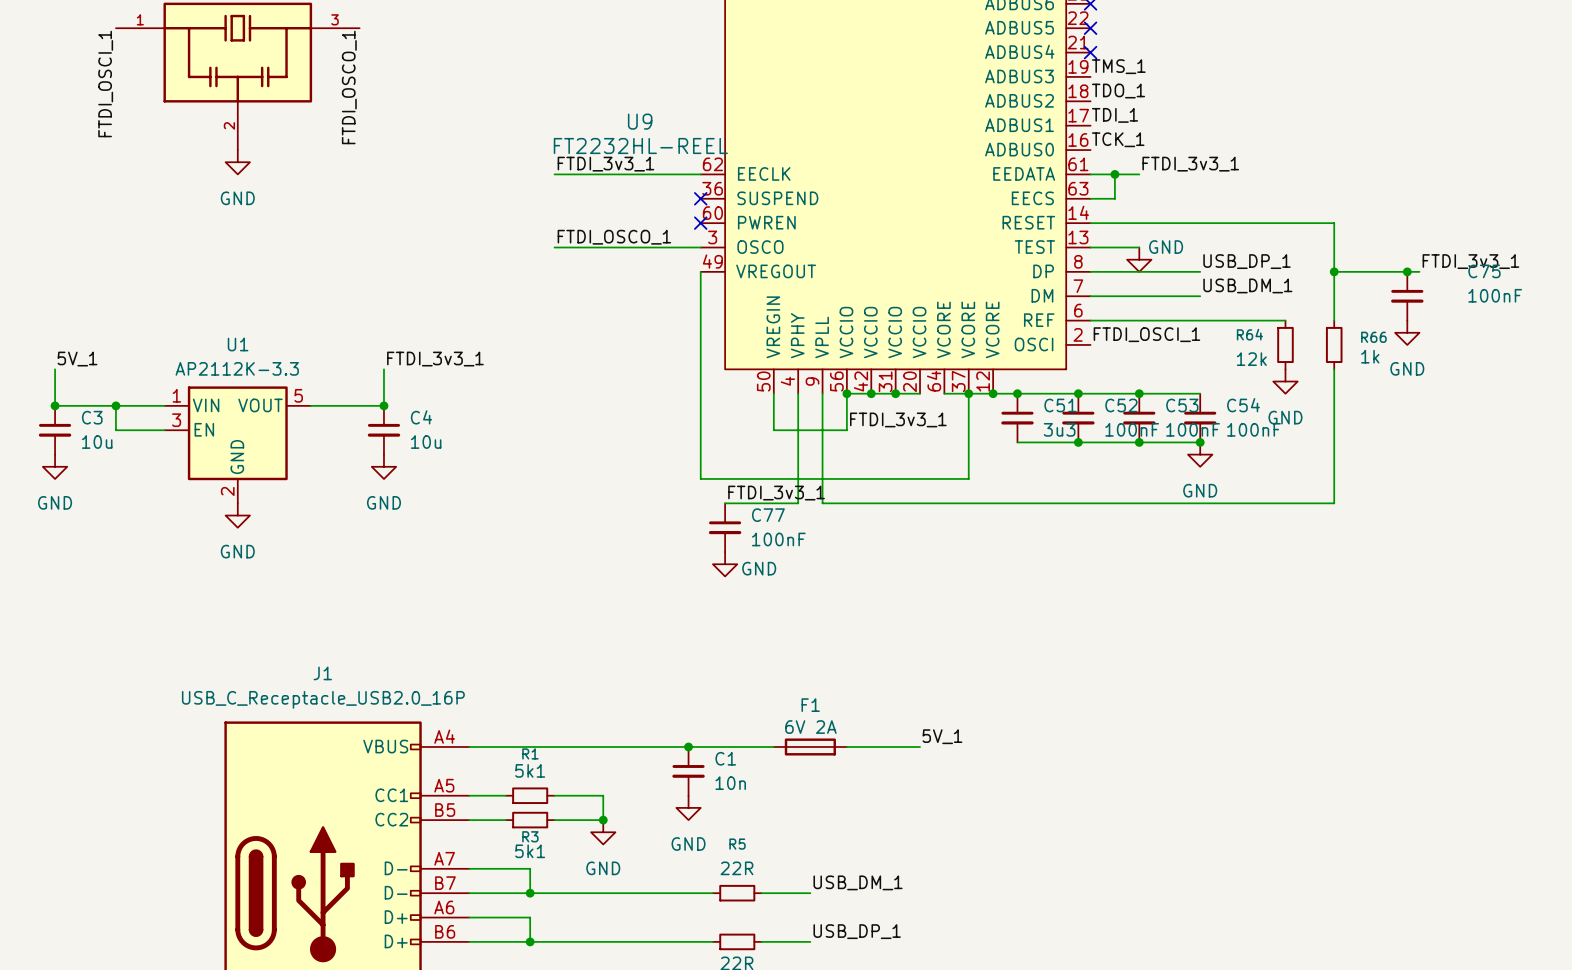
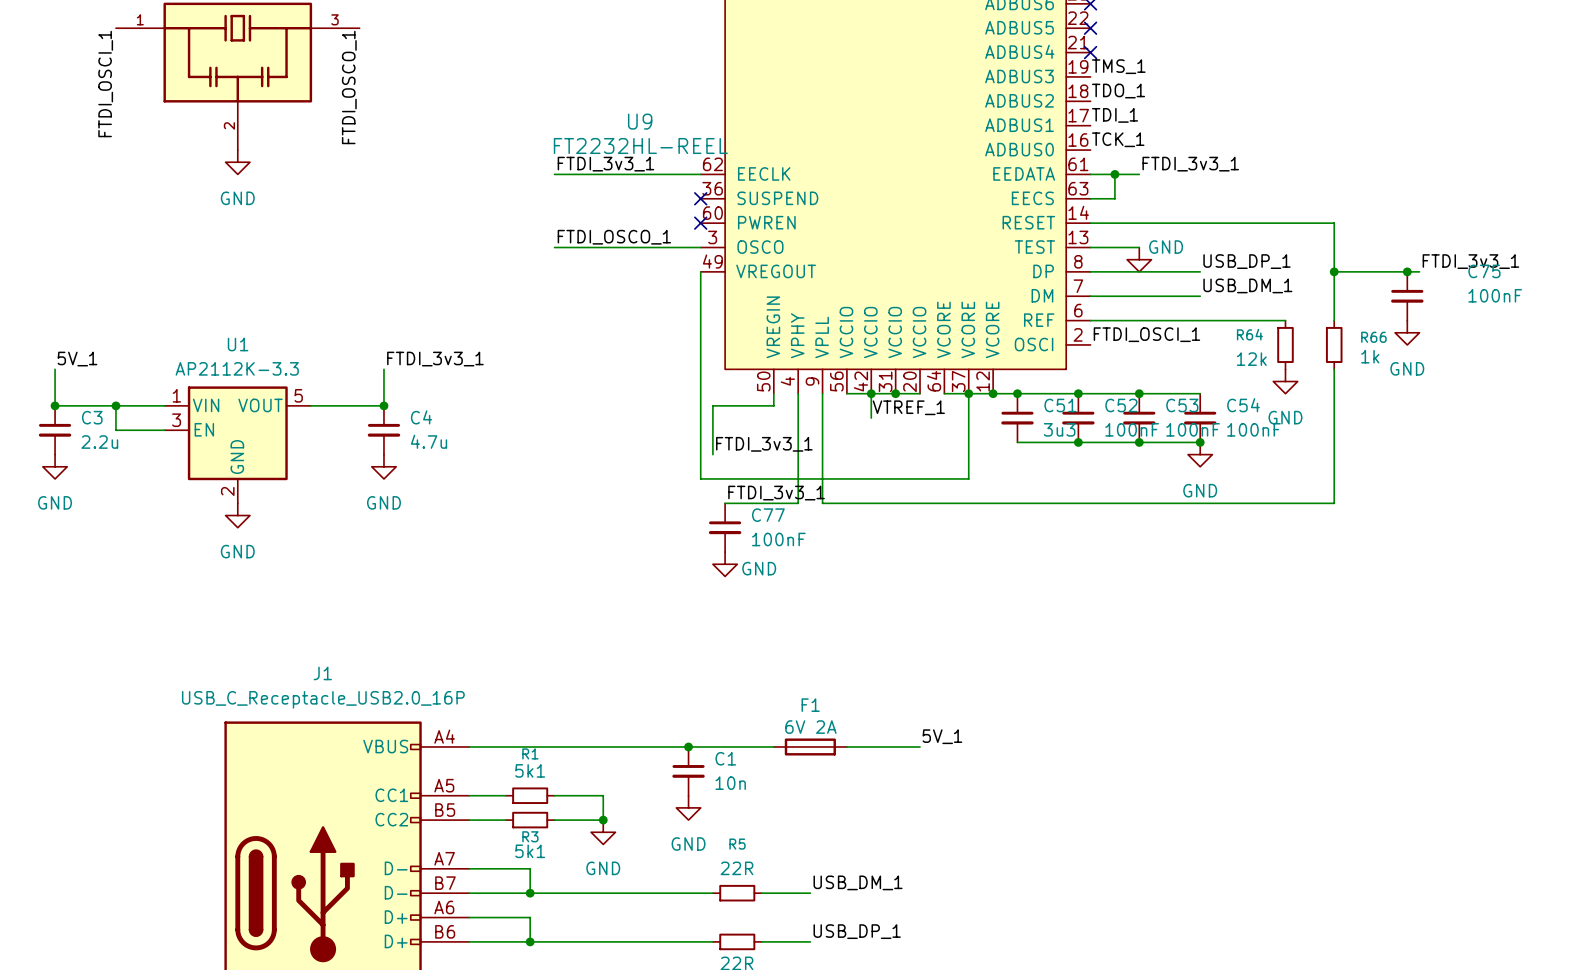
wire: (846, 393) (846, 430) (773, 430) (773, 405) -> (712, 454) (712, 405) (773, 405)
junction: (846, 393) -> none
wire: none -> (871, 393) (871, 418)
label: none -> VTREF_1 (908, 407)
label position: FTDI_3v3_1 (898, 419) -> FTDI_3v3_1 (764, 444)
C3 value: 10u (97, 442) -> 2.2u (99, 442)
C4 value: 10u (426, 442) -> 4.7u (429, 441)

